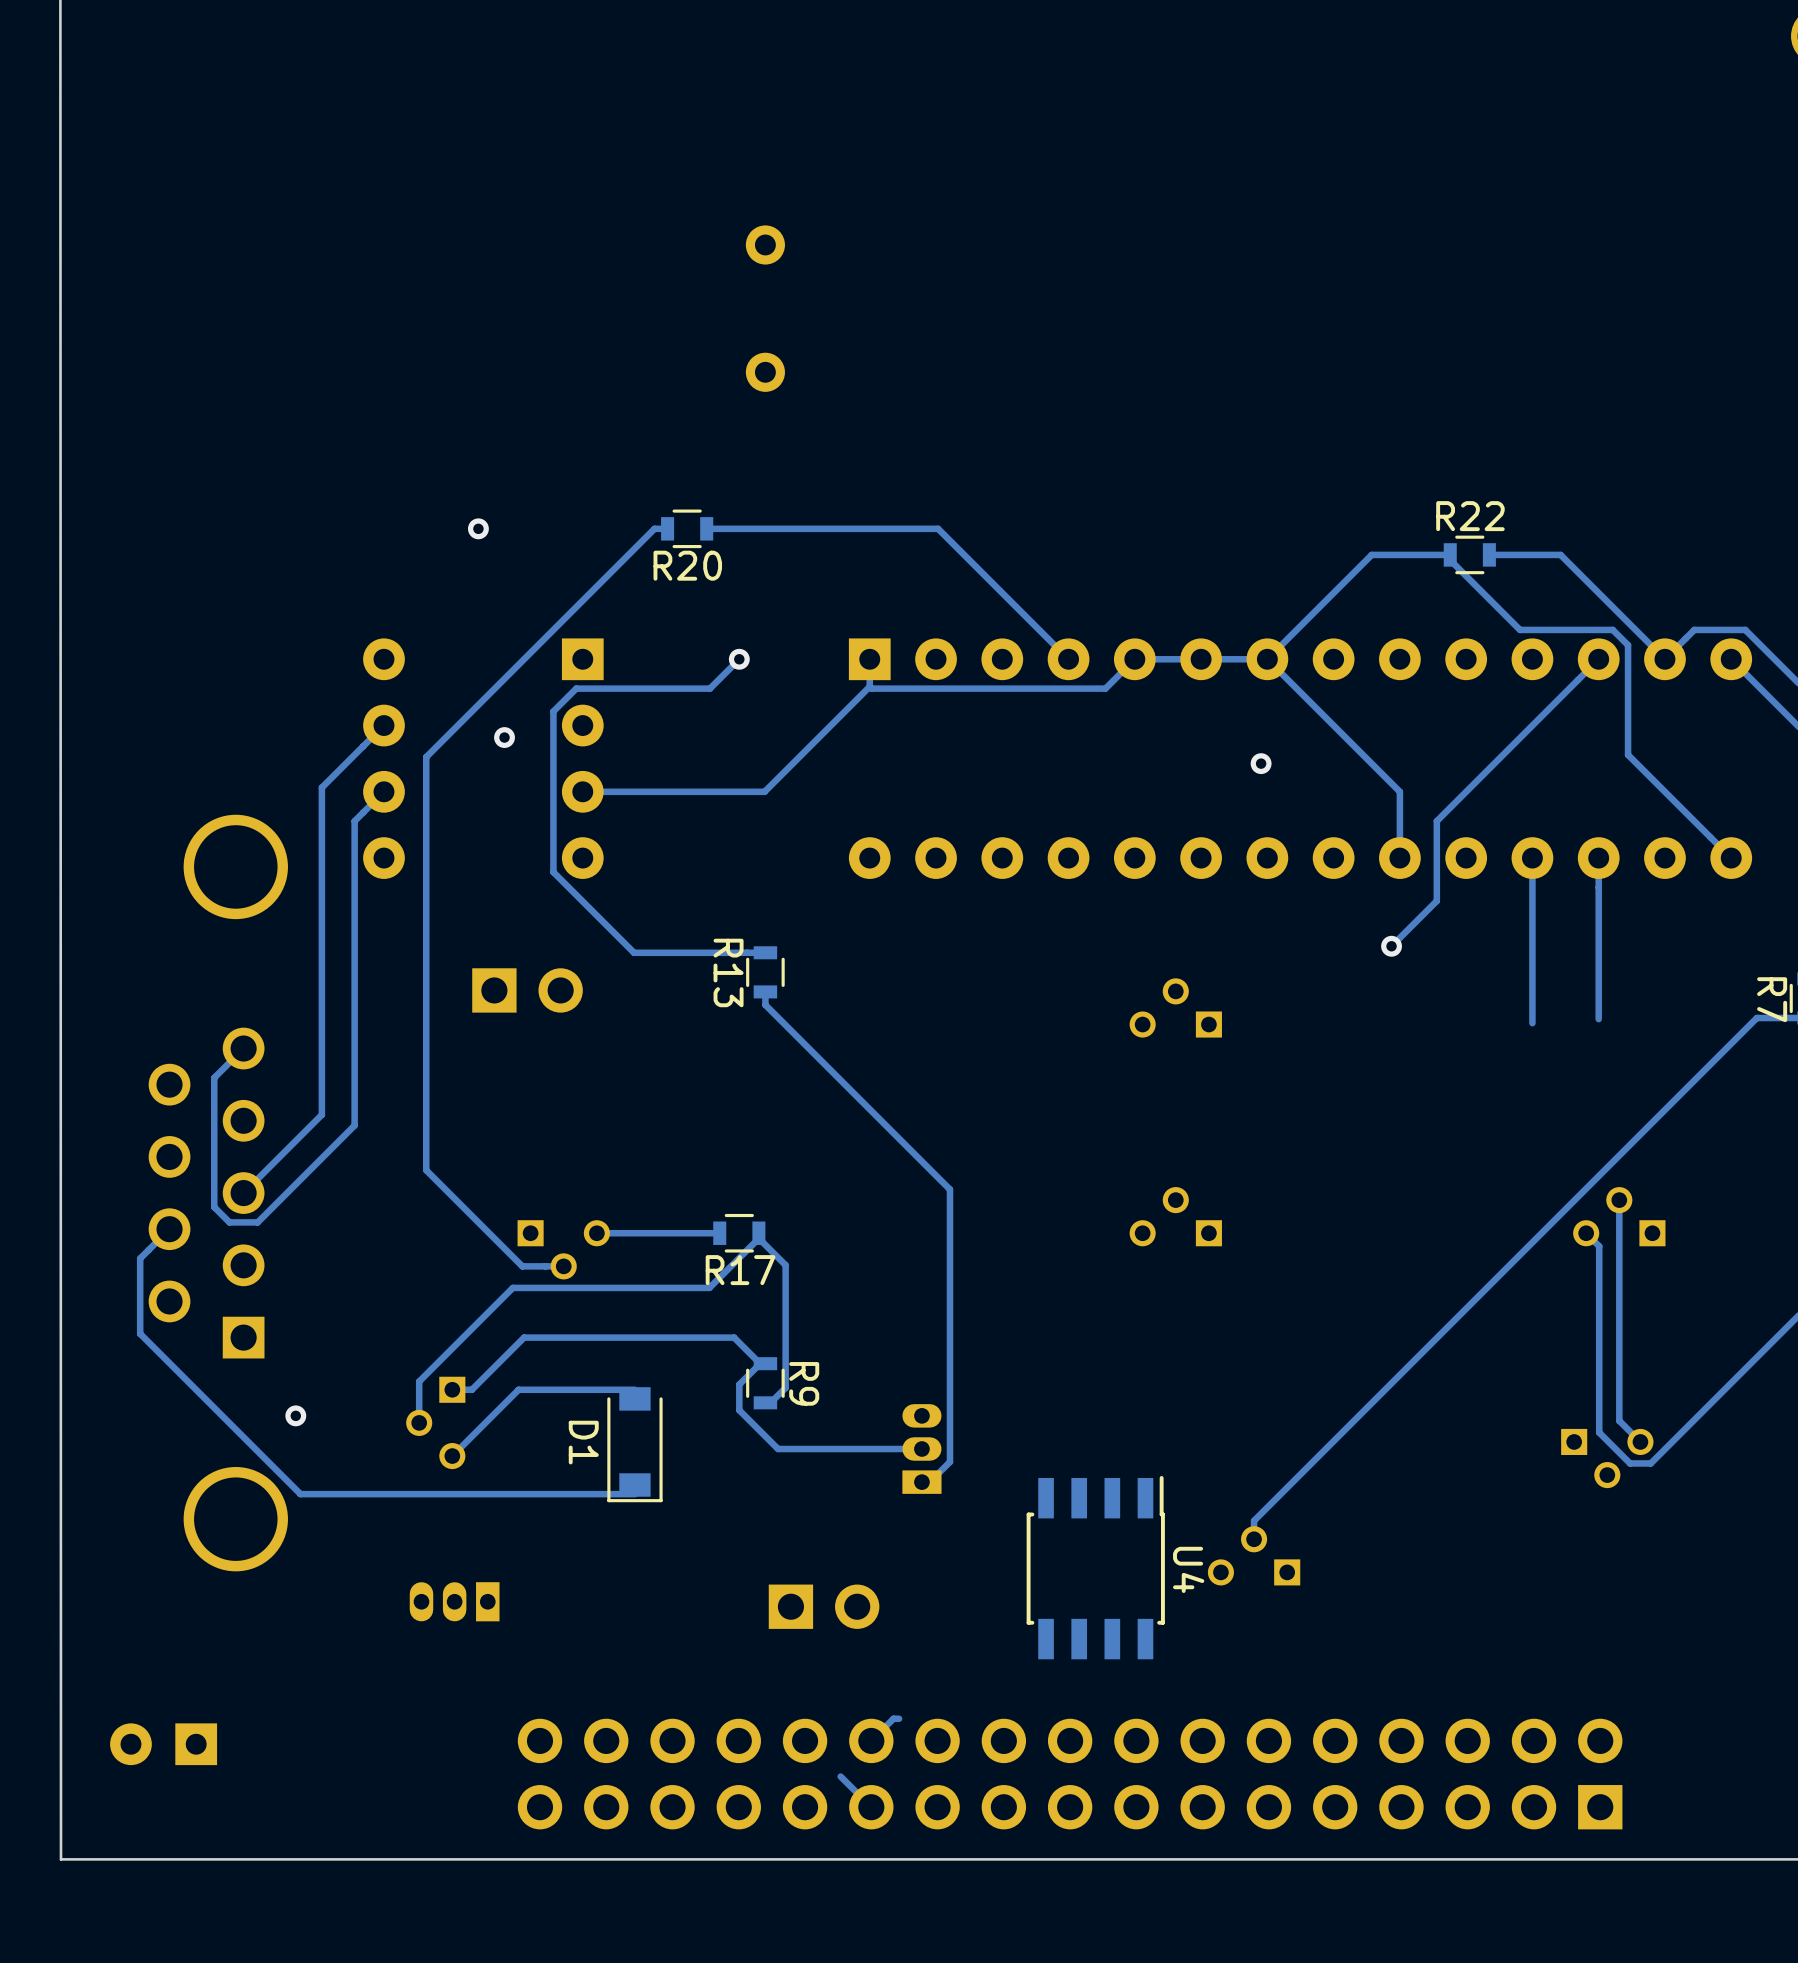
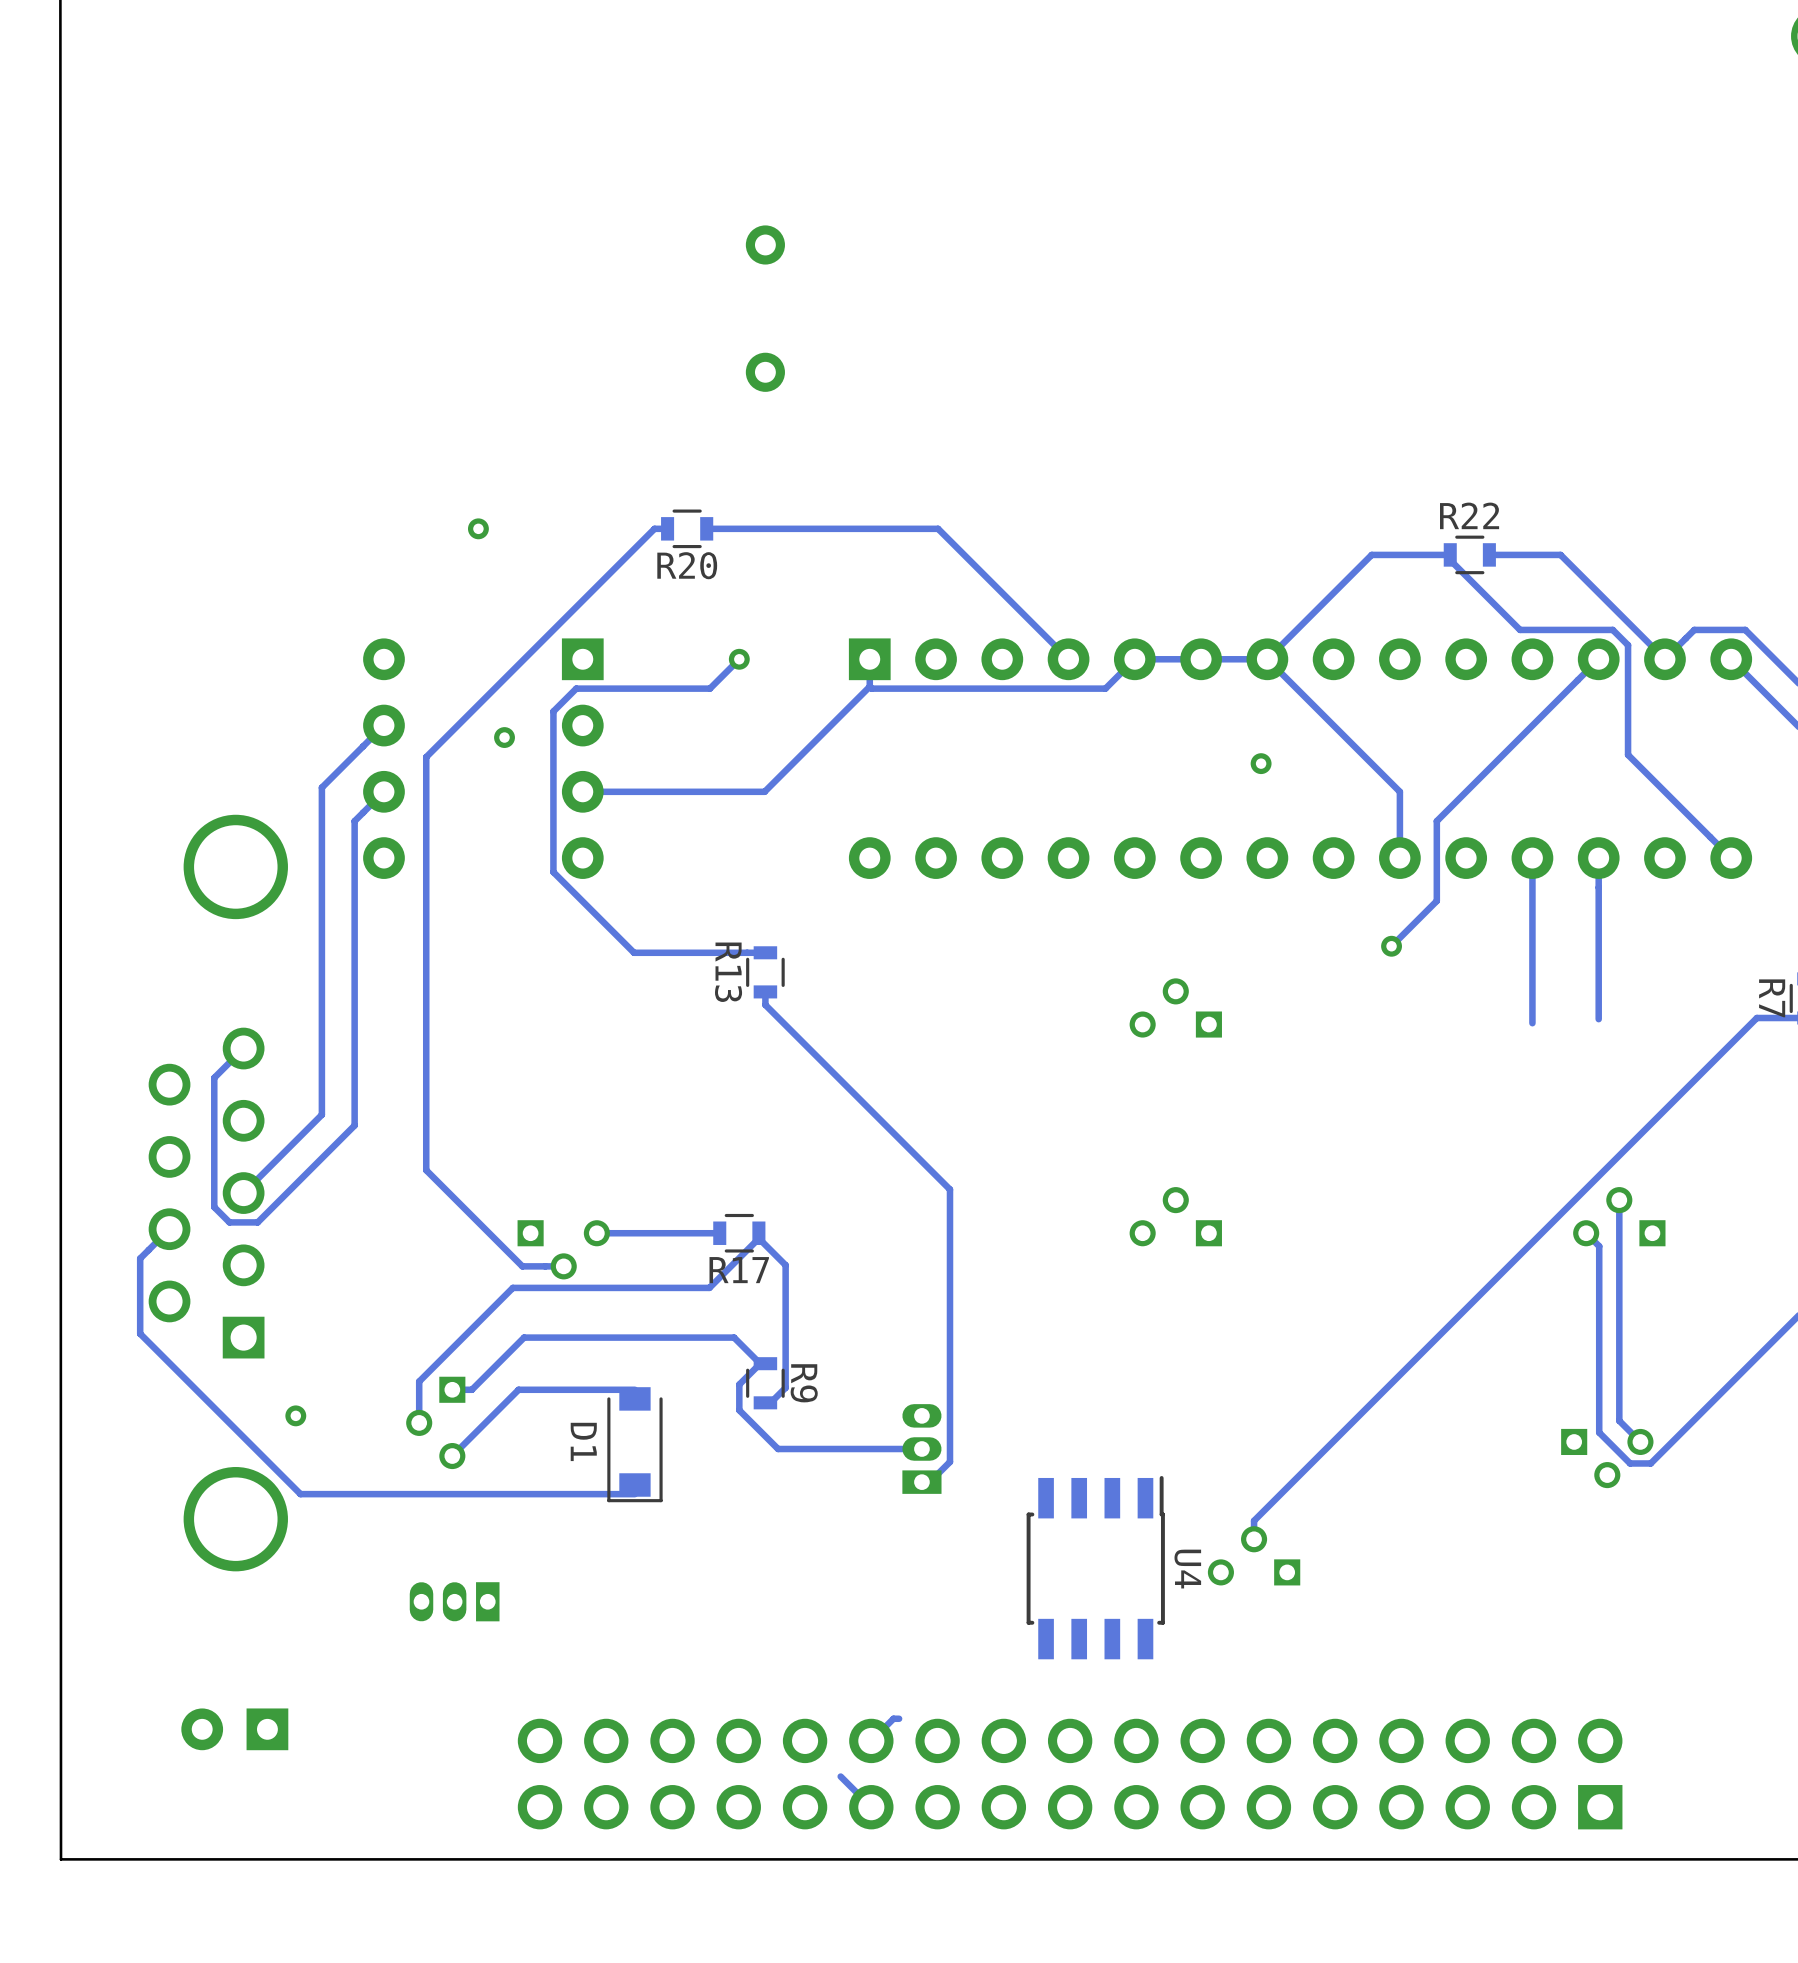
part: (527, 990) -> none
part: (824, 1606) -> none
part position: (163, 1744) -> (234, 1729)

